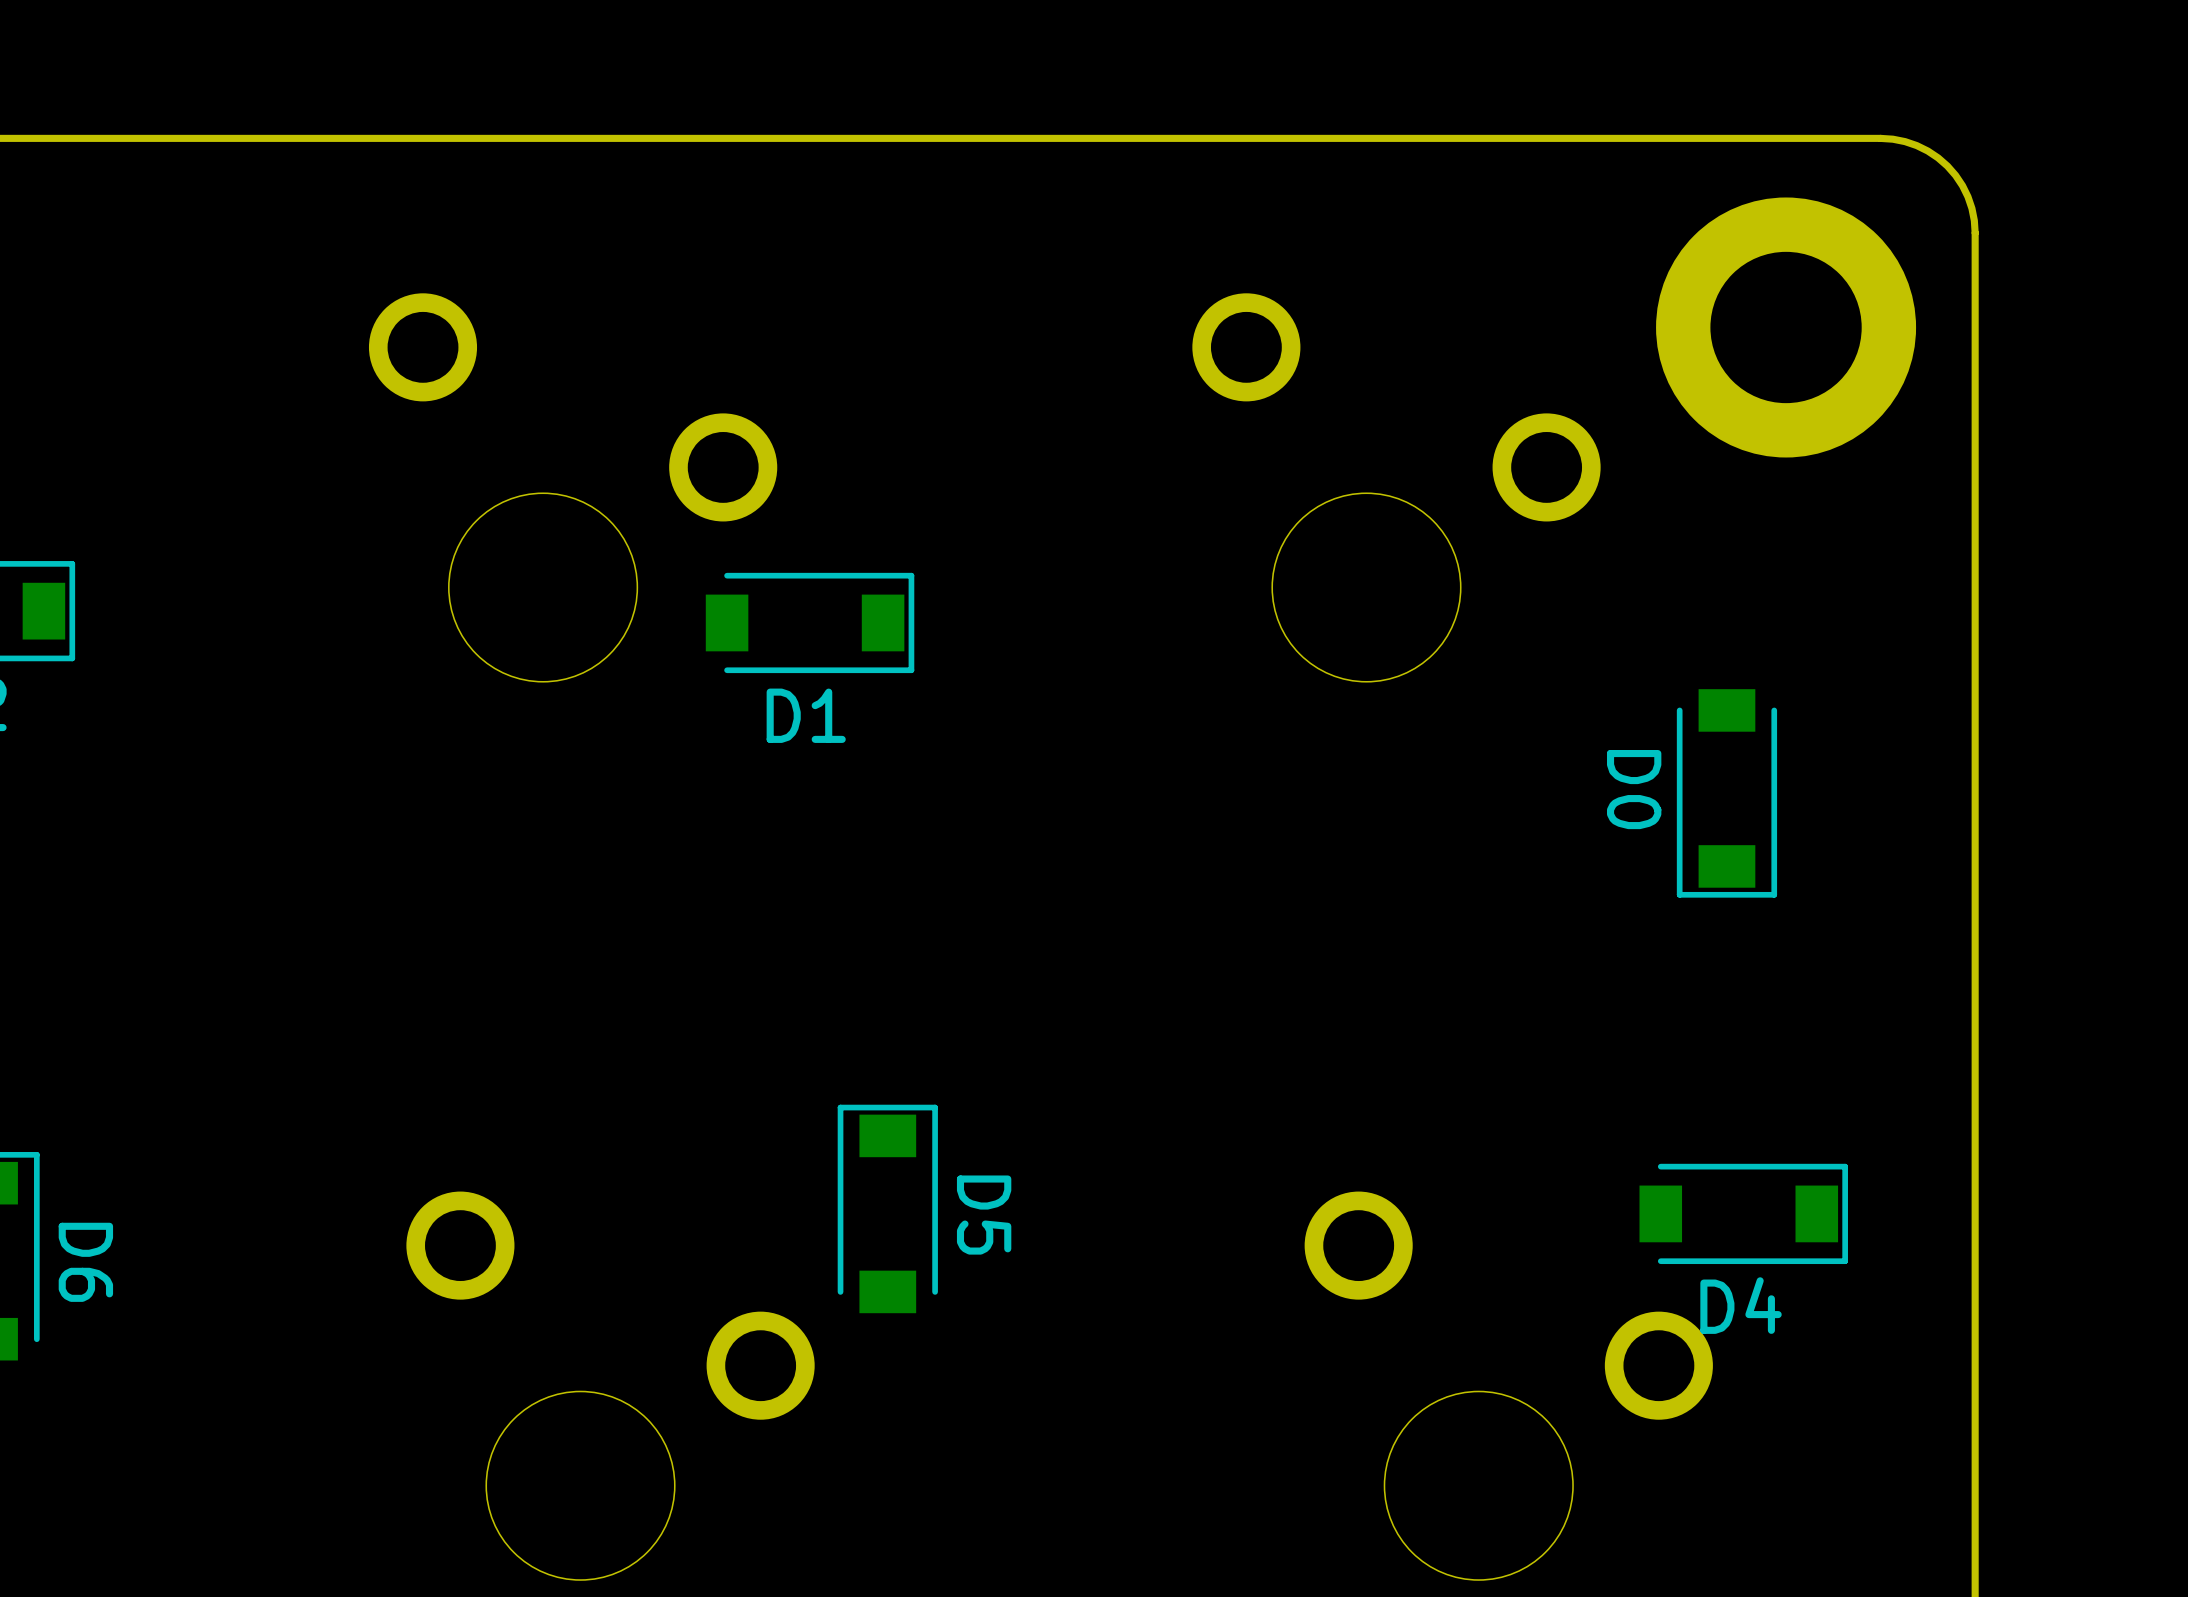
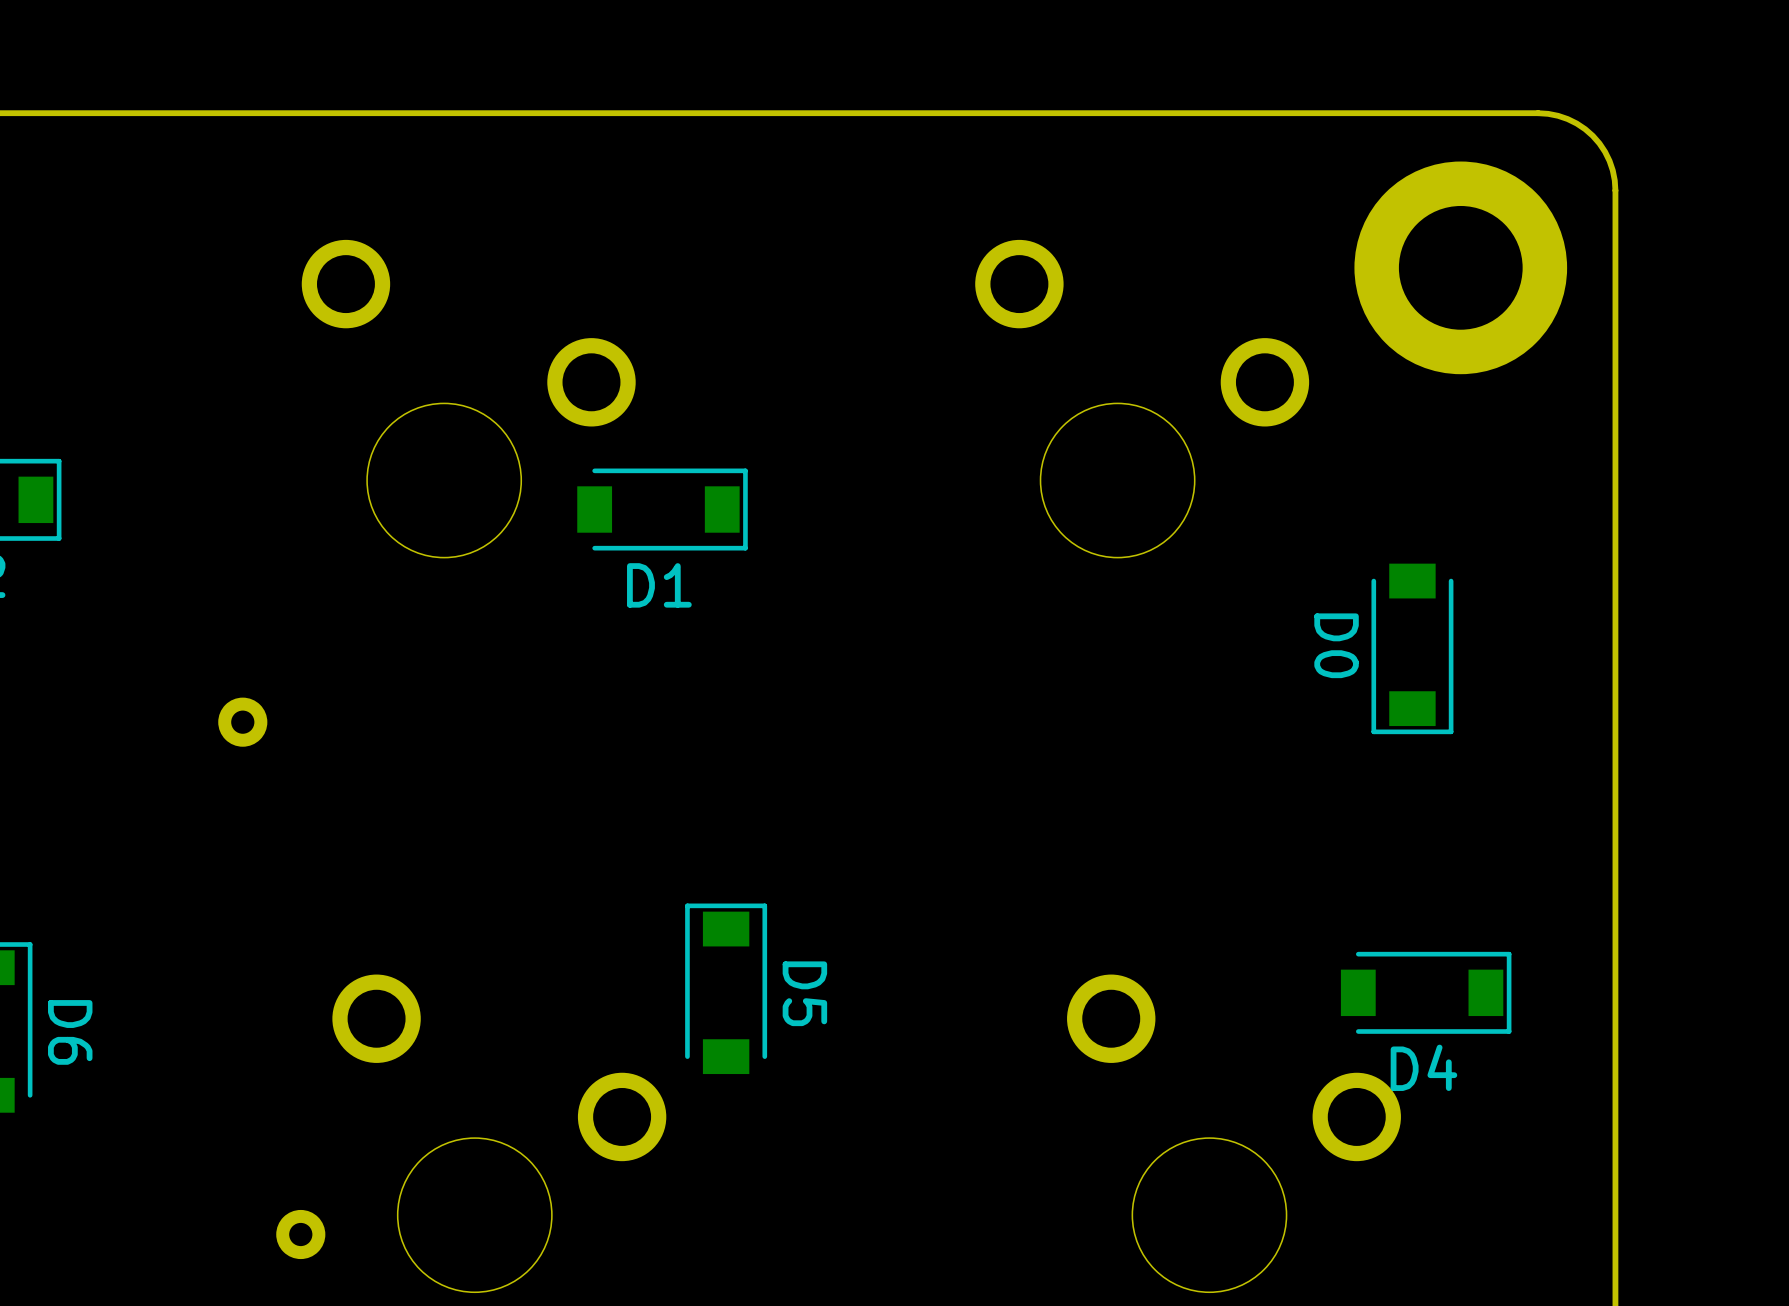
part: none -> (242, 722)
part: none -> (300, 1234)

